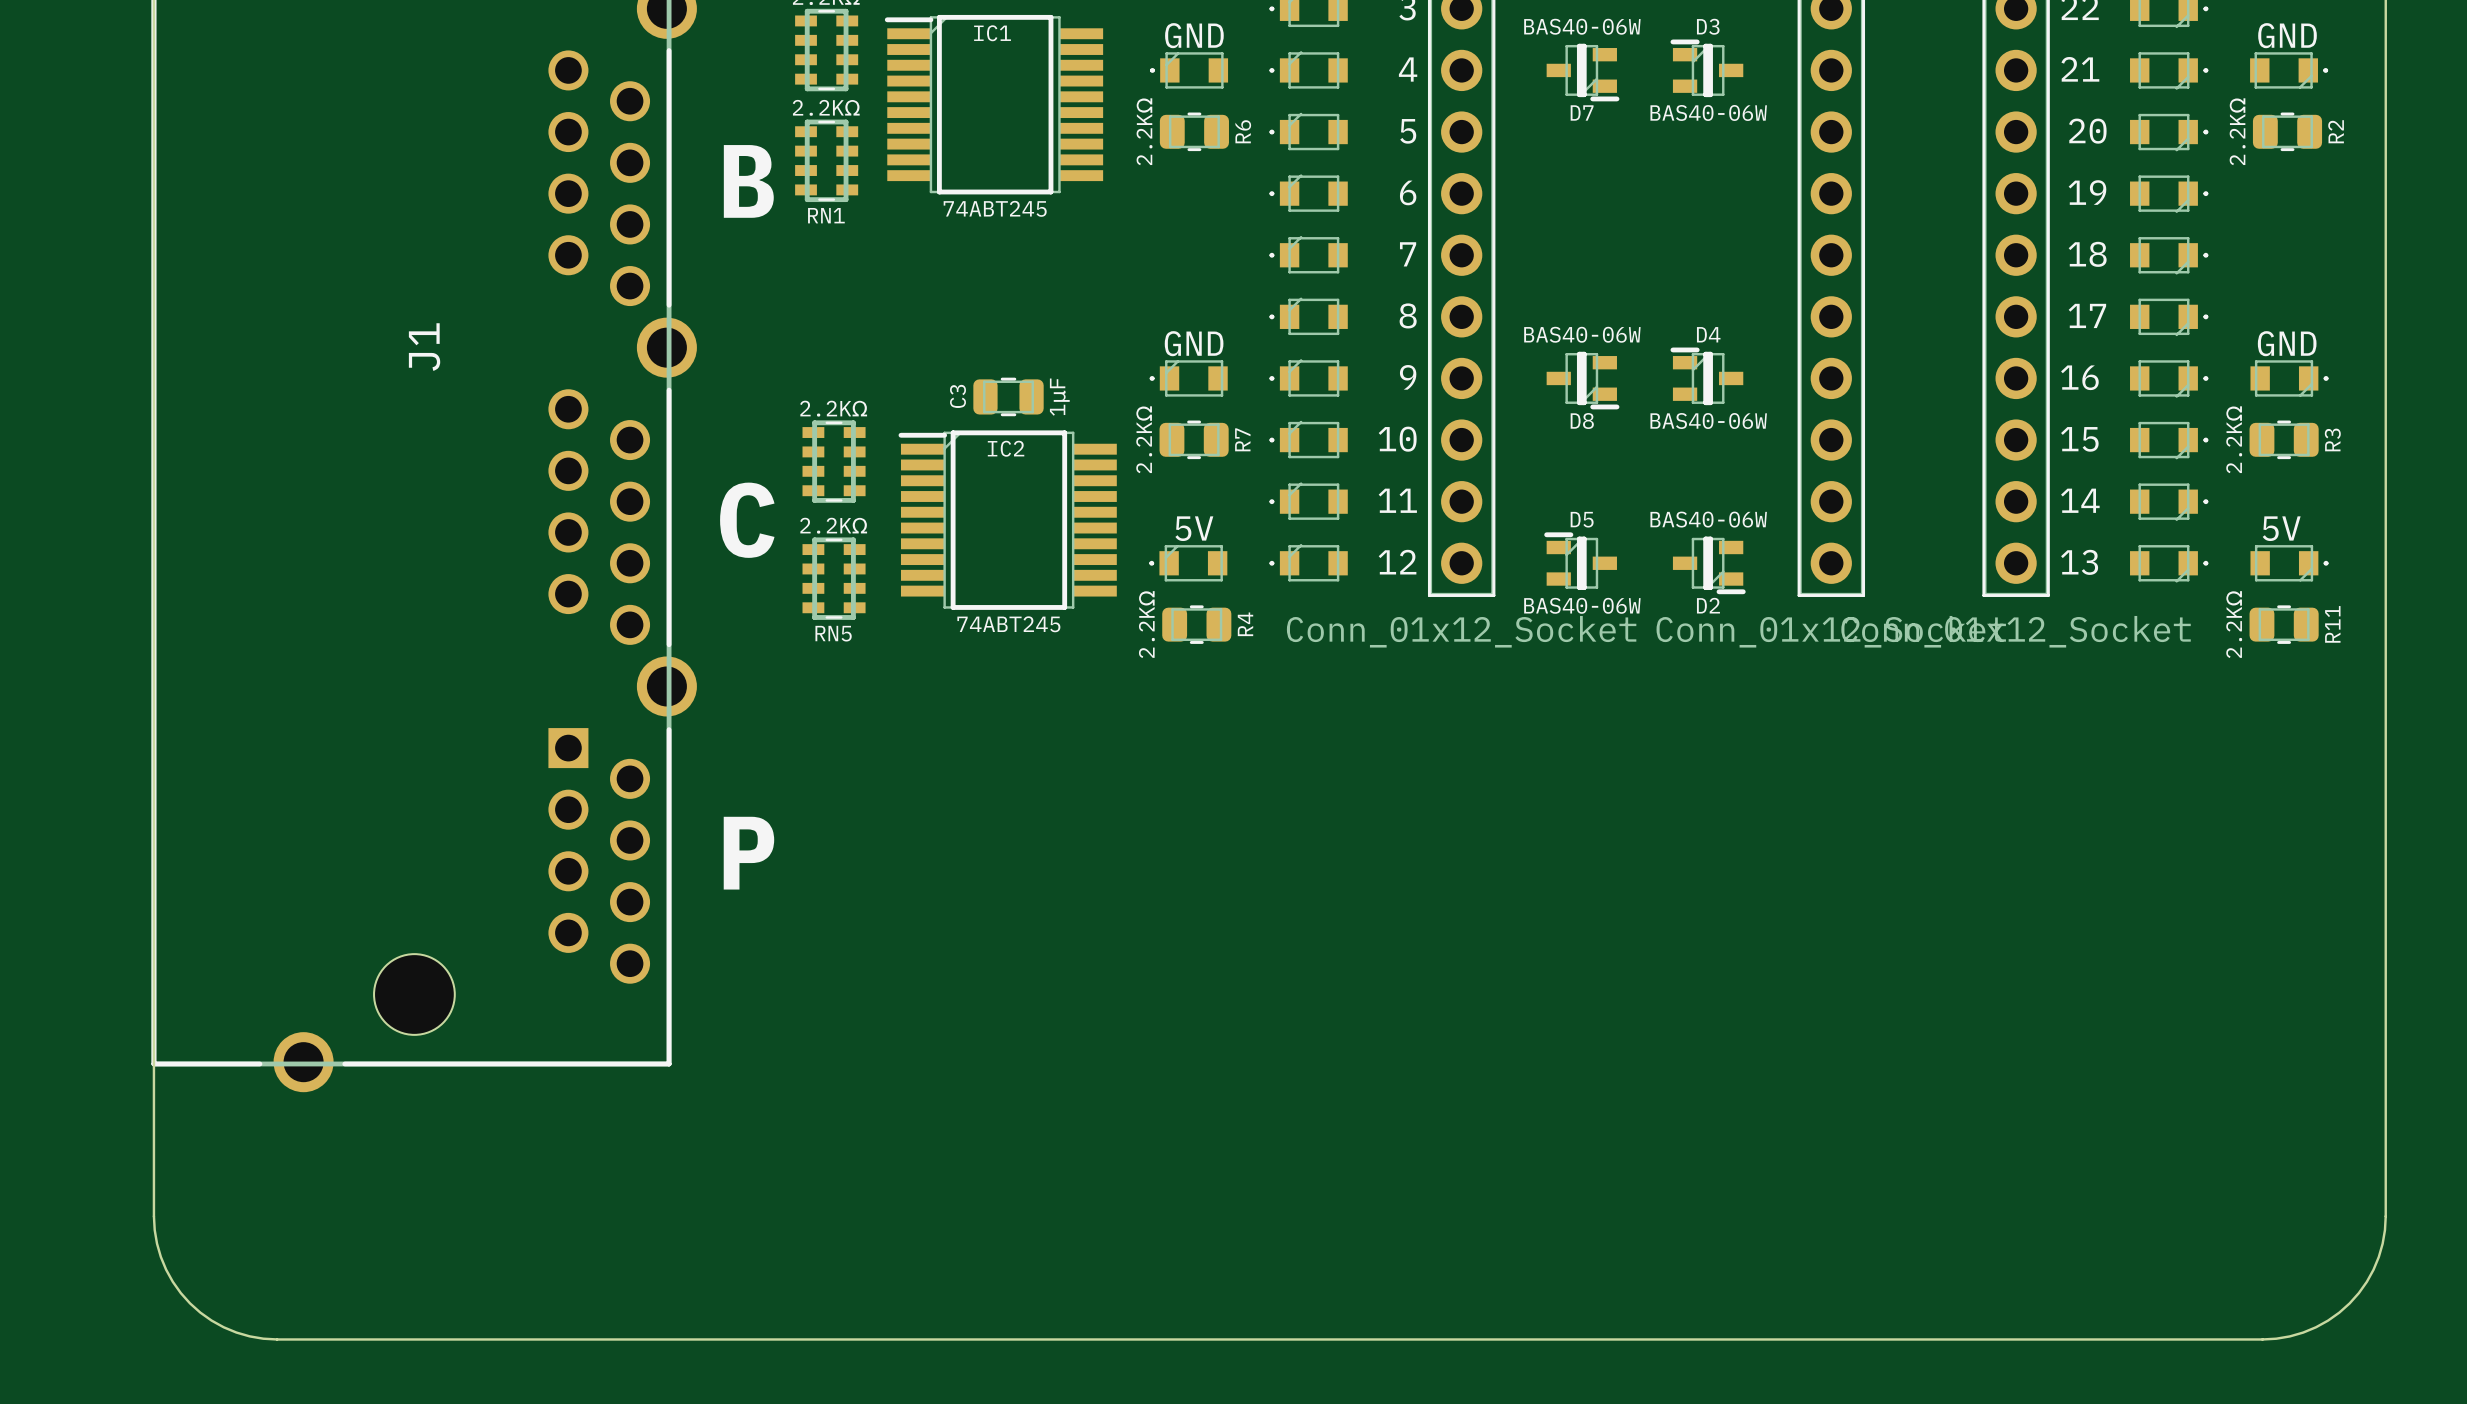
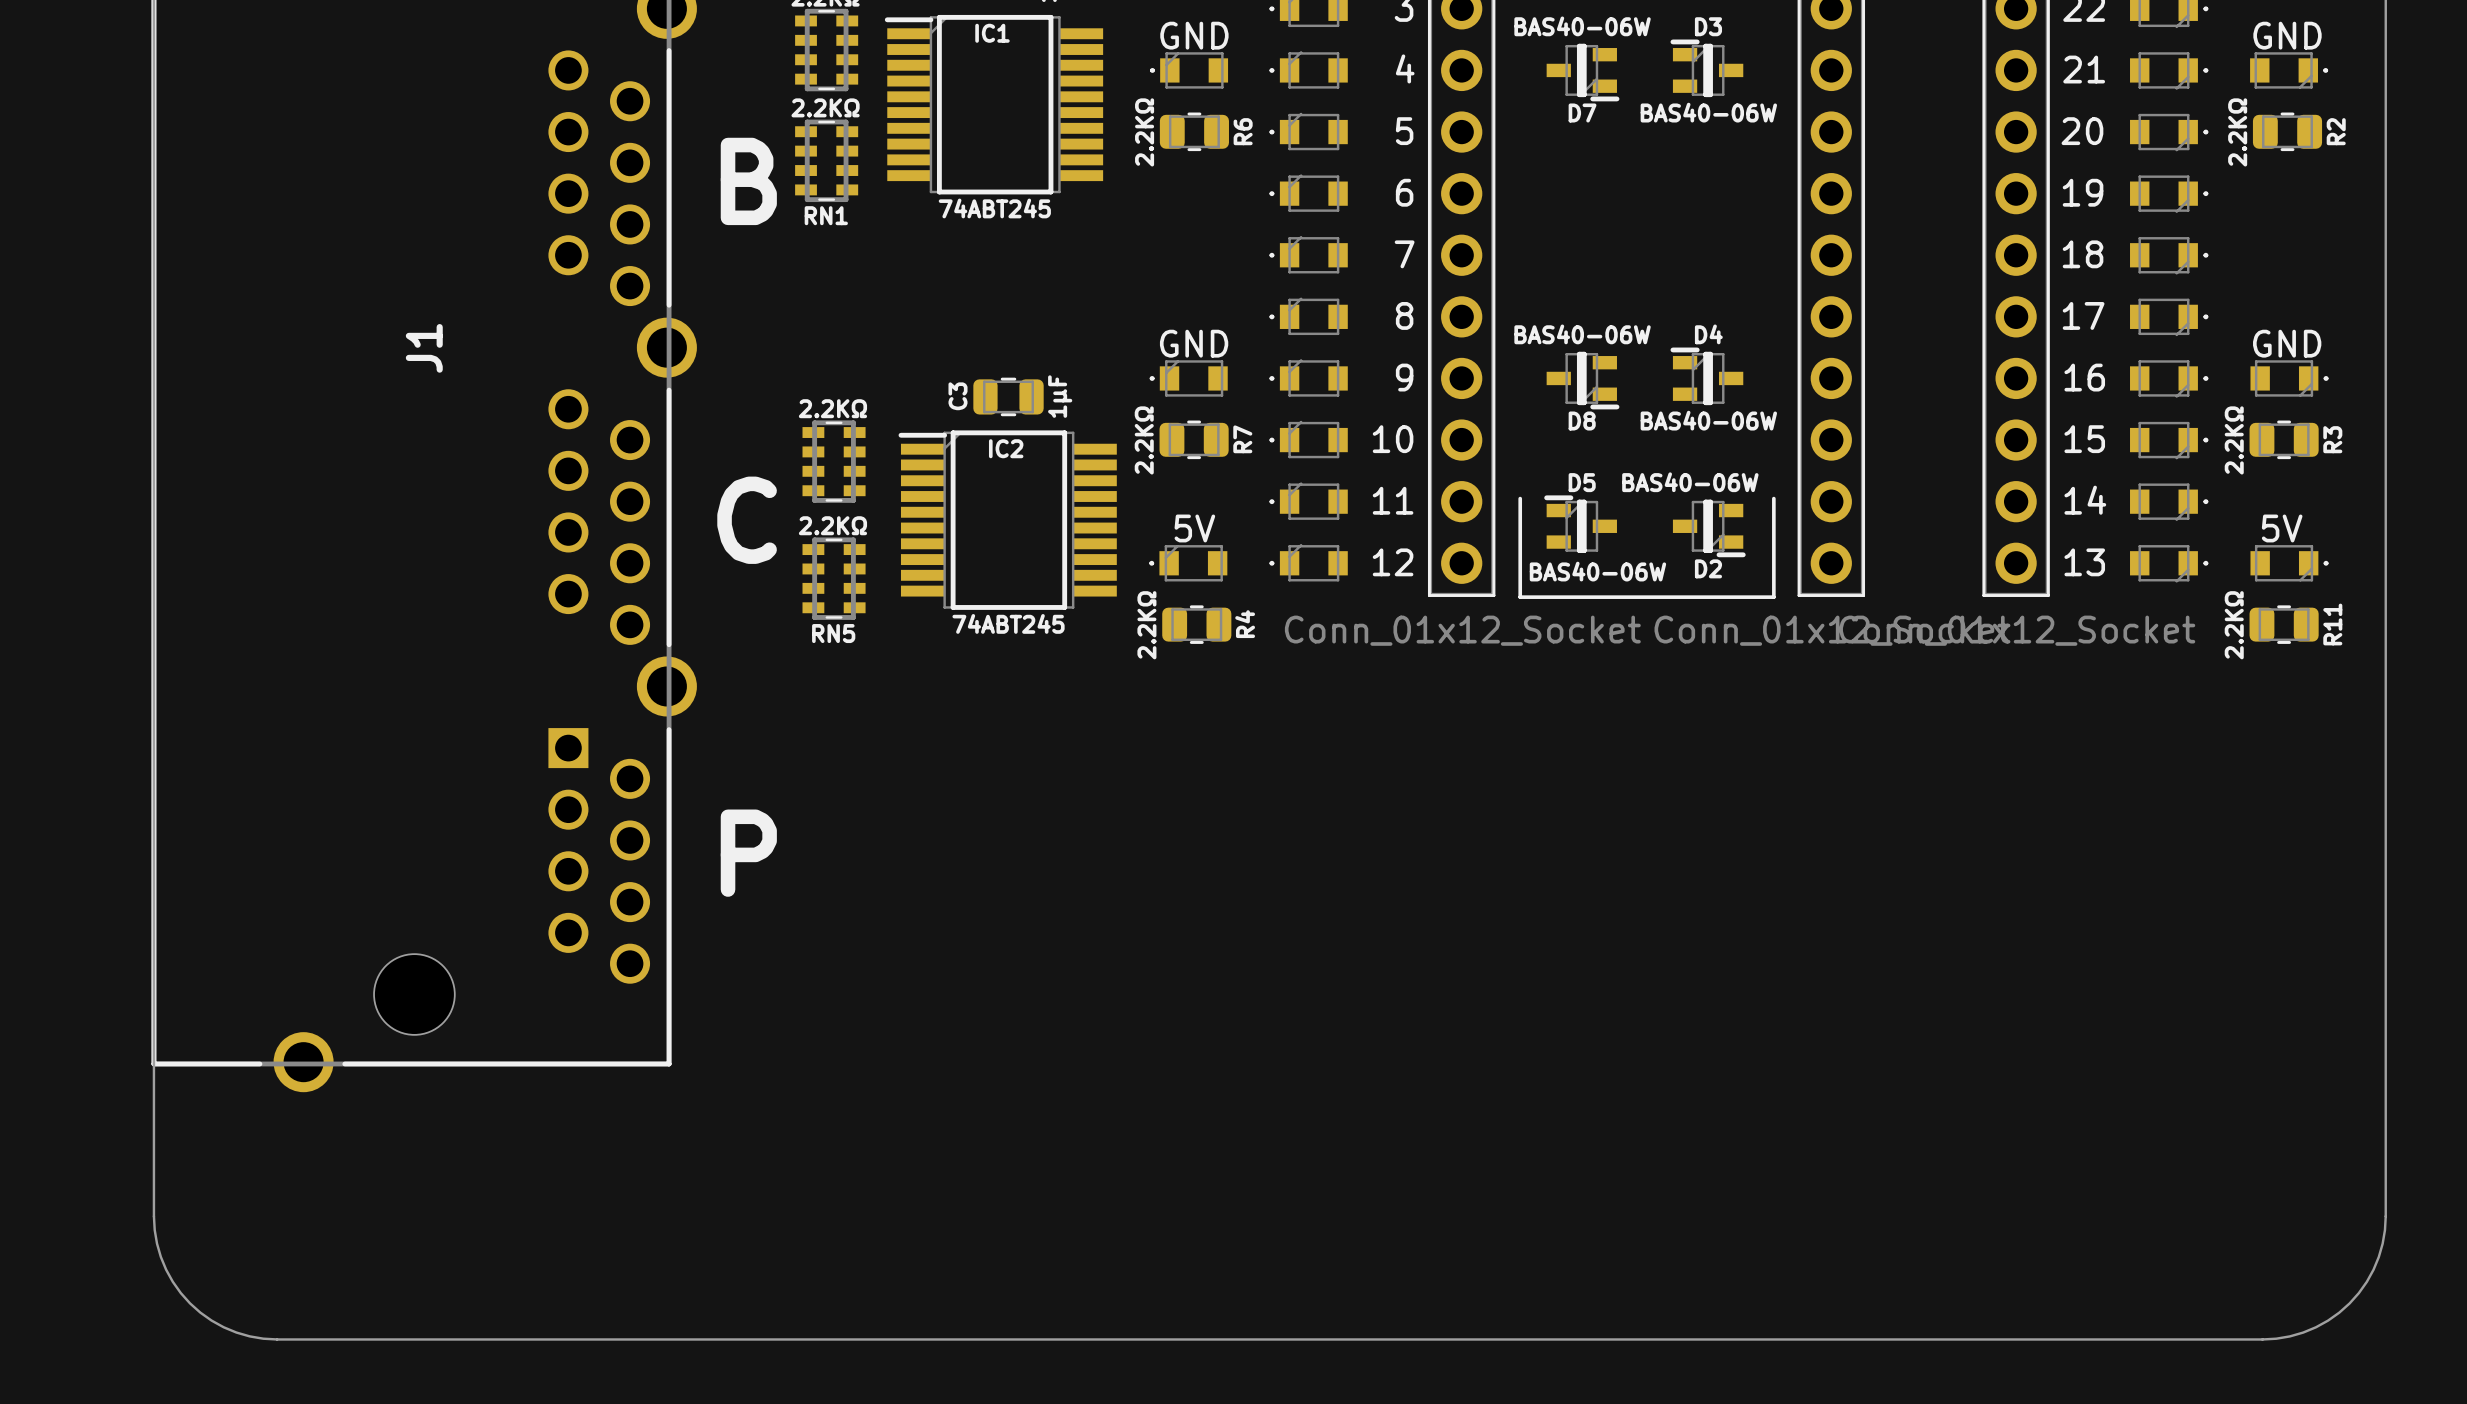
line: none -> (1520, 498) (1520, 597) (1773, 597) (1773, 498)
D2 text position: BAS40-06W (1708, 519) -> BAS40-06W (1690, 482)
D5 position: (1580, 561) -> (1580, 524)
D2 position: (1709, 565) -> (1709, 528)
D5 text position: BAS40-06W (1582, 605) -> BAS40-06W (1597, 571)

